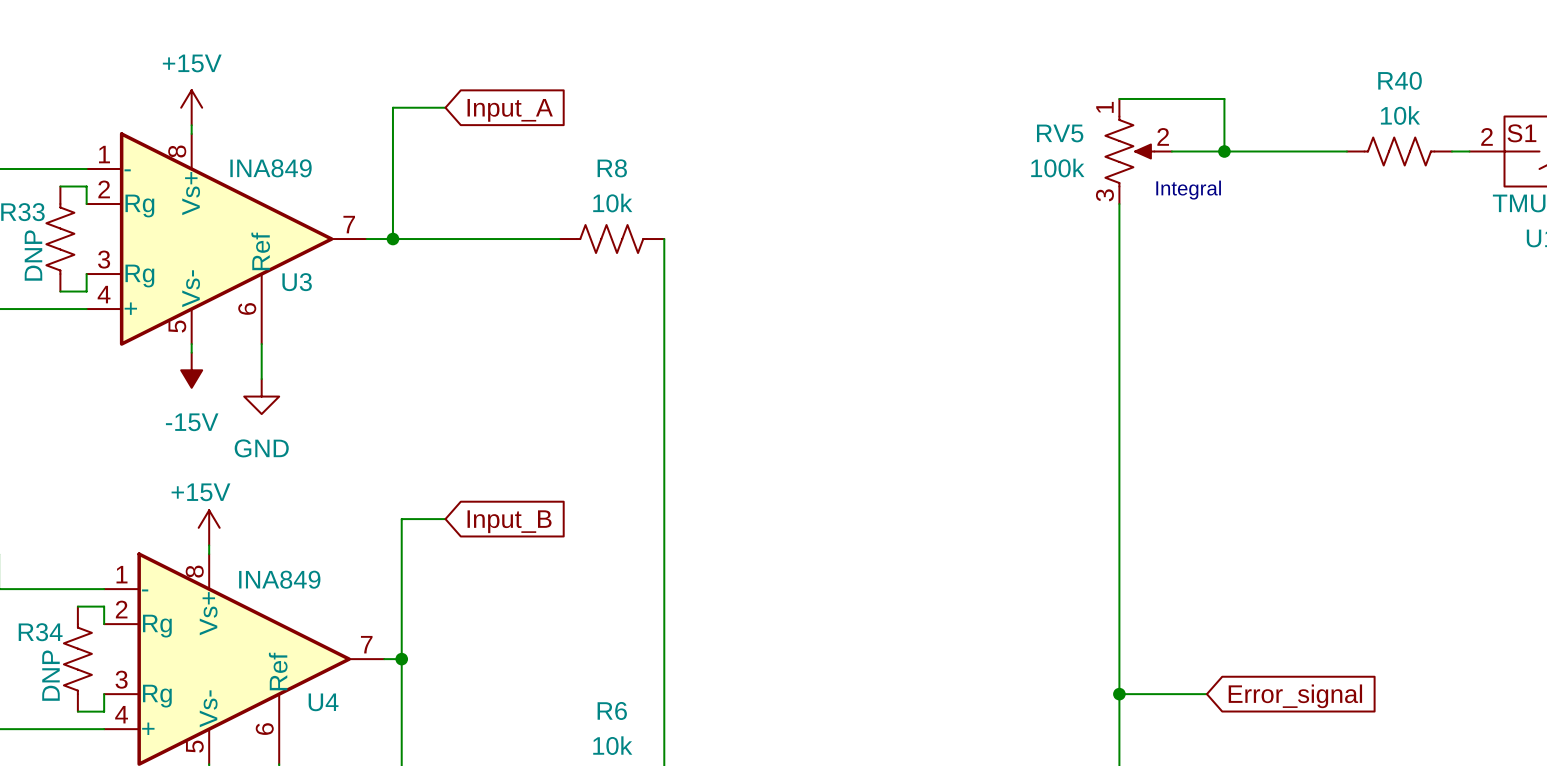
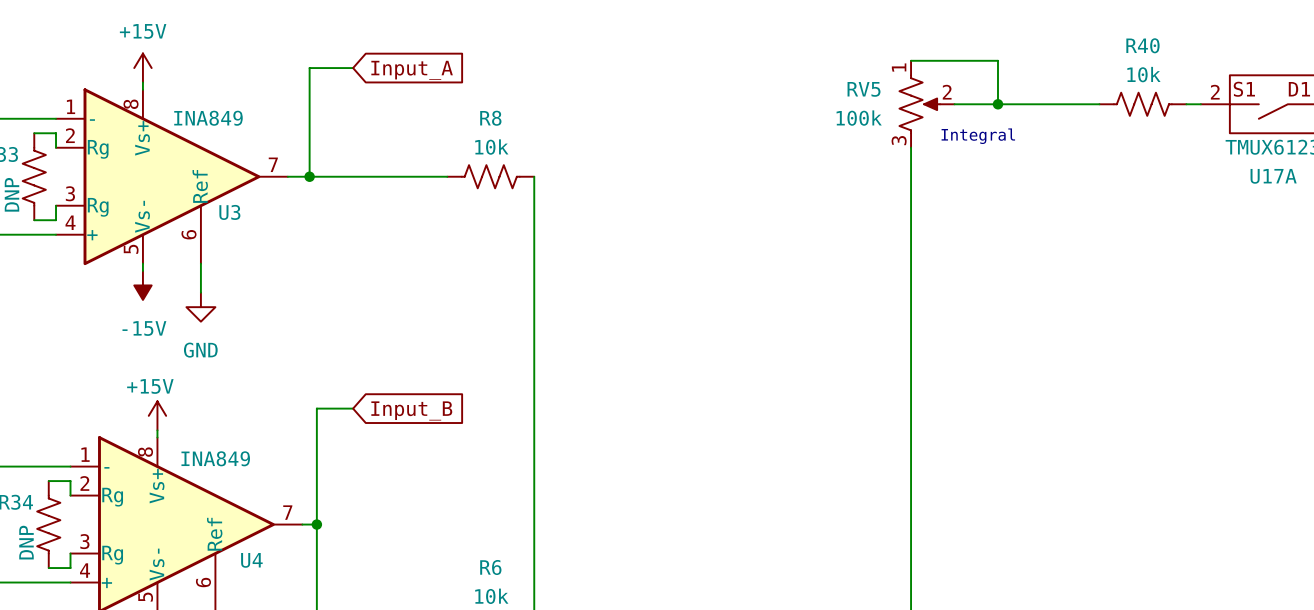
wire: (1119, 694) (1206, 694) -> none
junction: (1119, 694) -> none
global label: Error_signal (1295, 696) -> none

